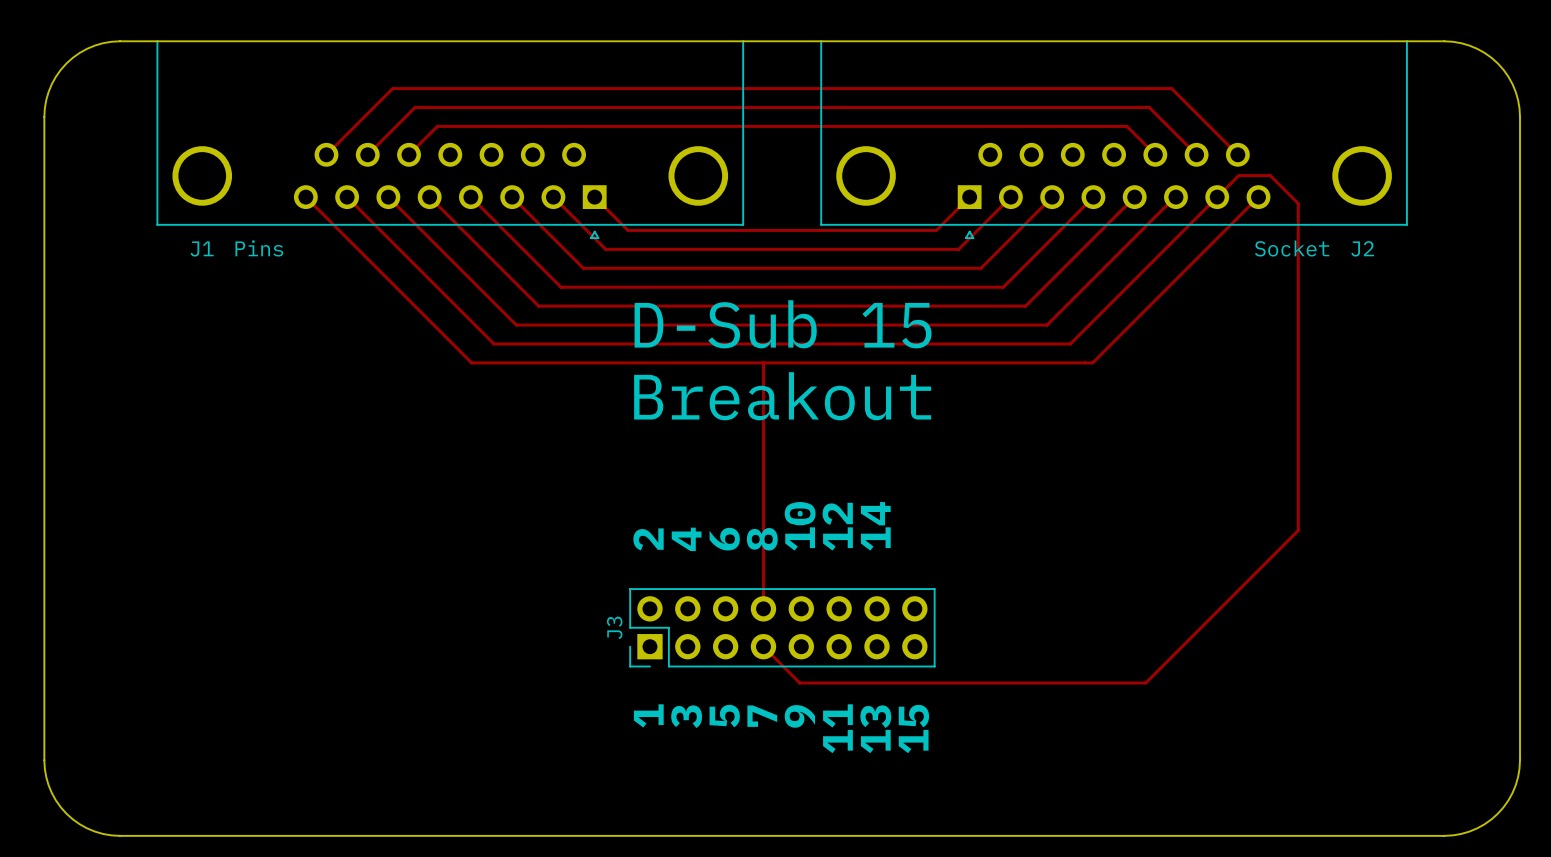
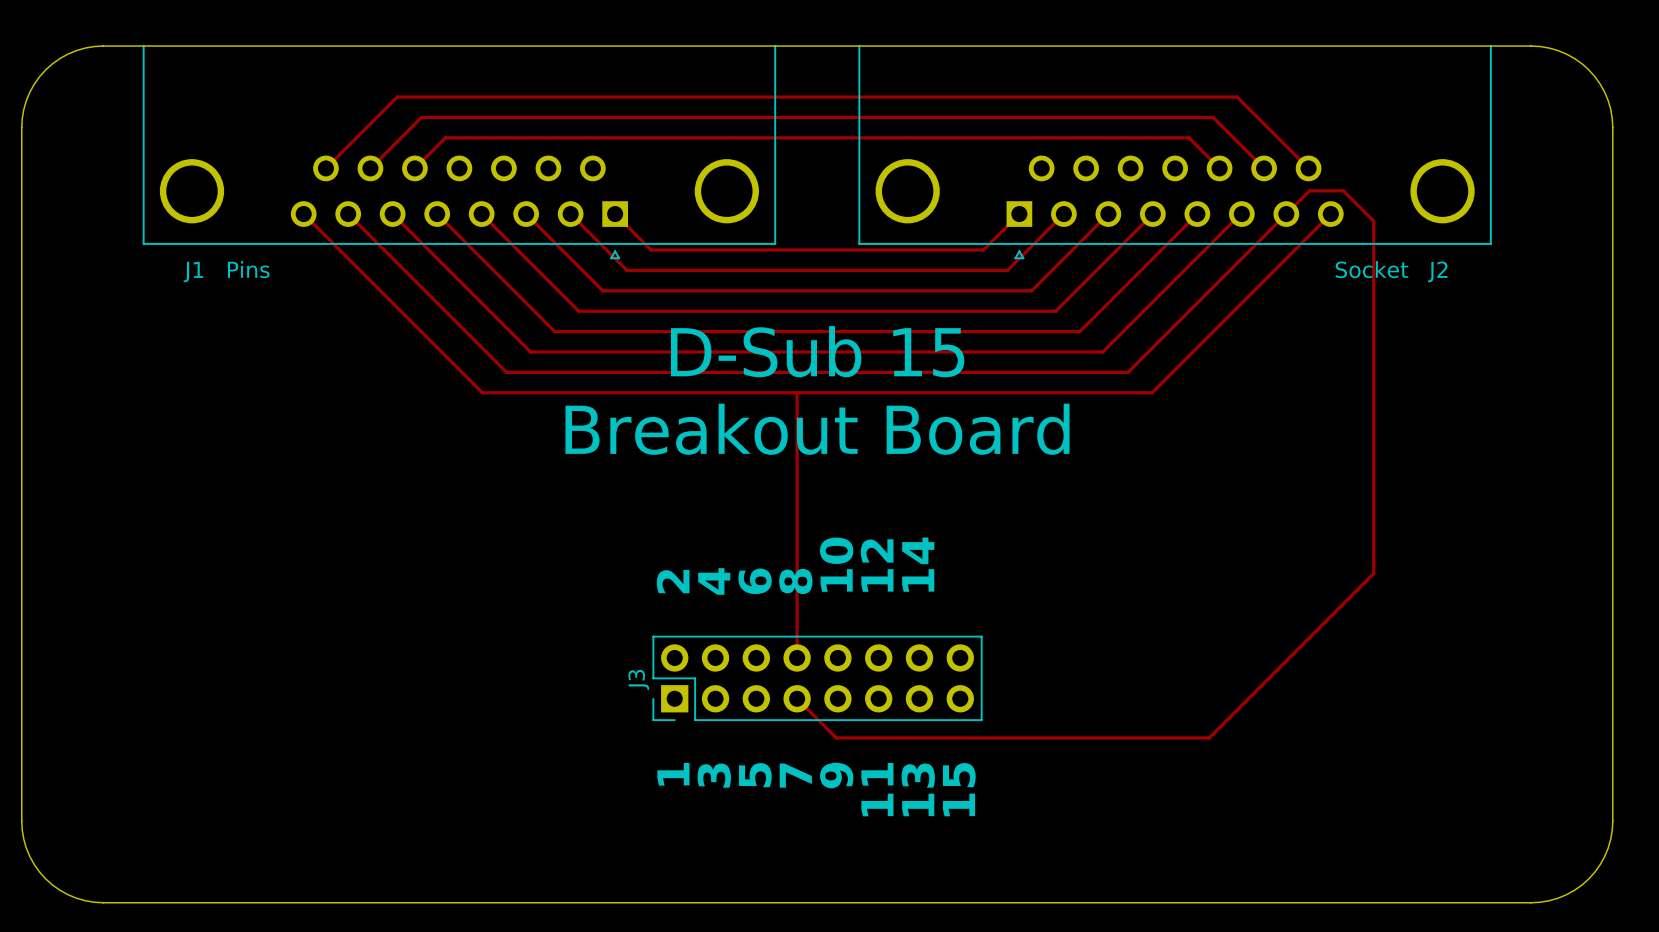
text: Breakout (782, 396) -> Breakout Board (817, 429)

